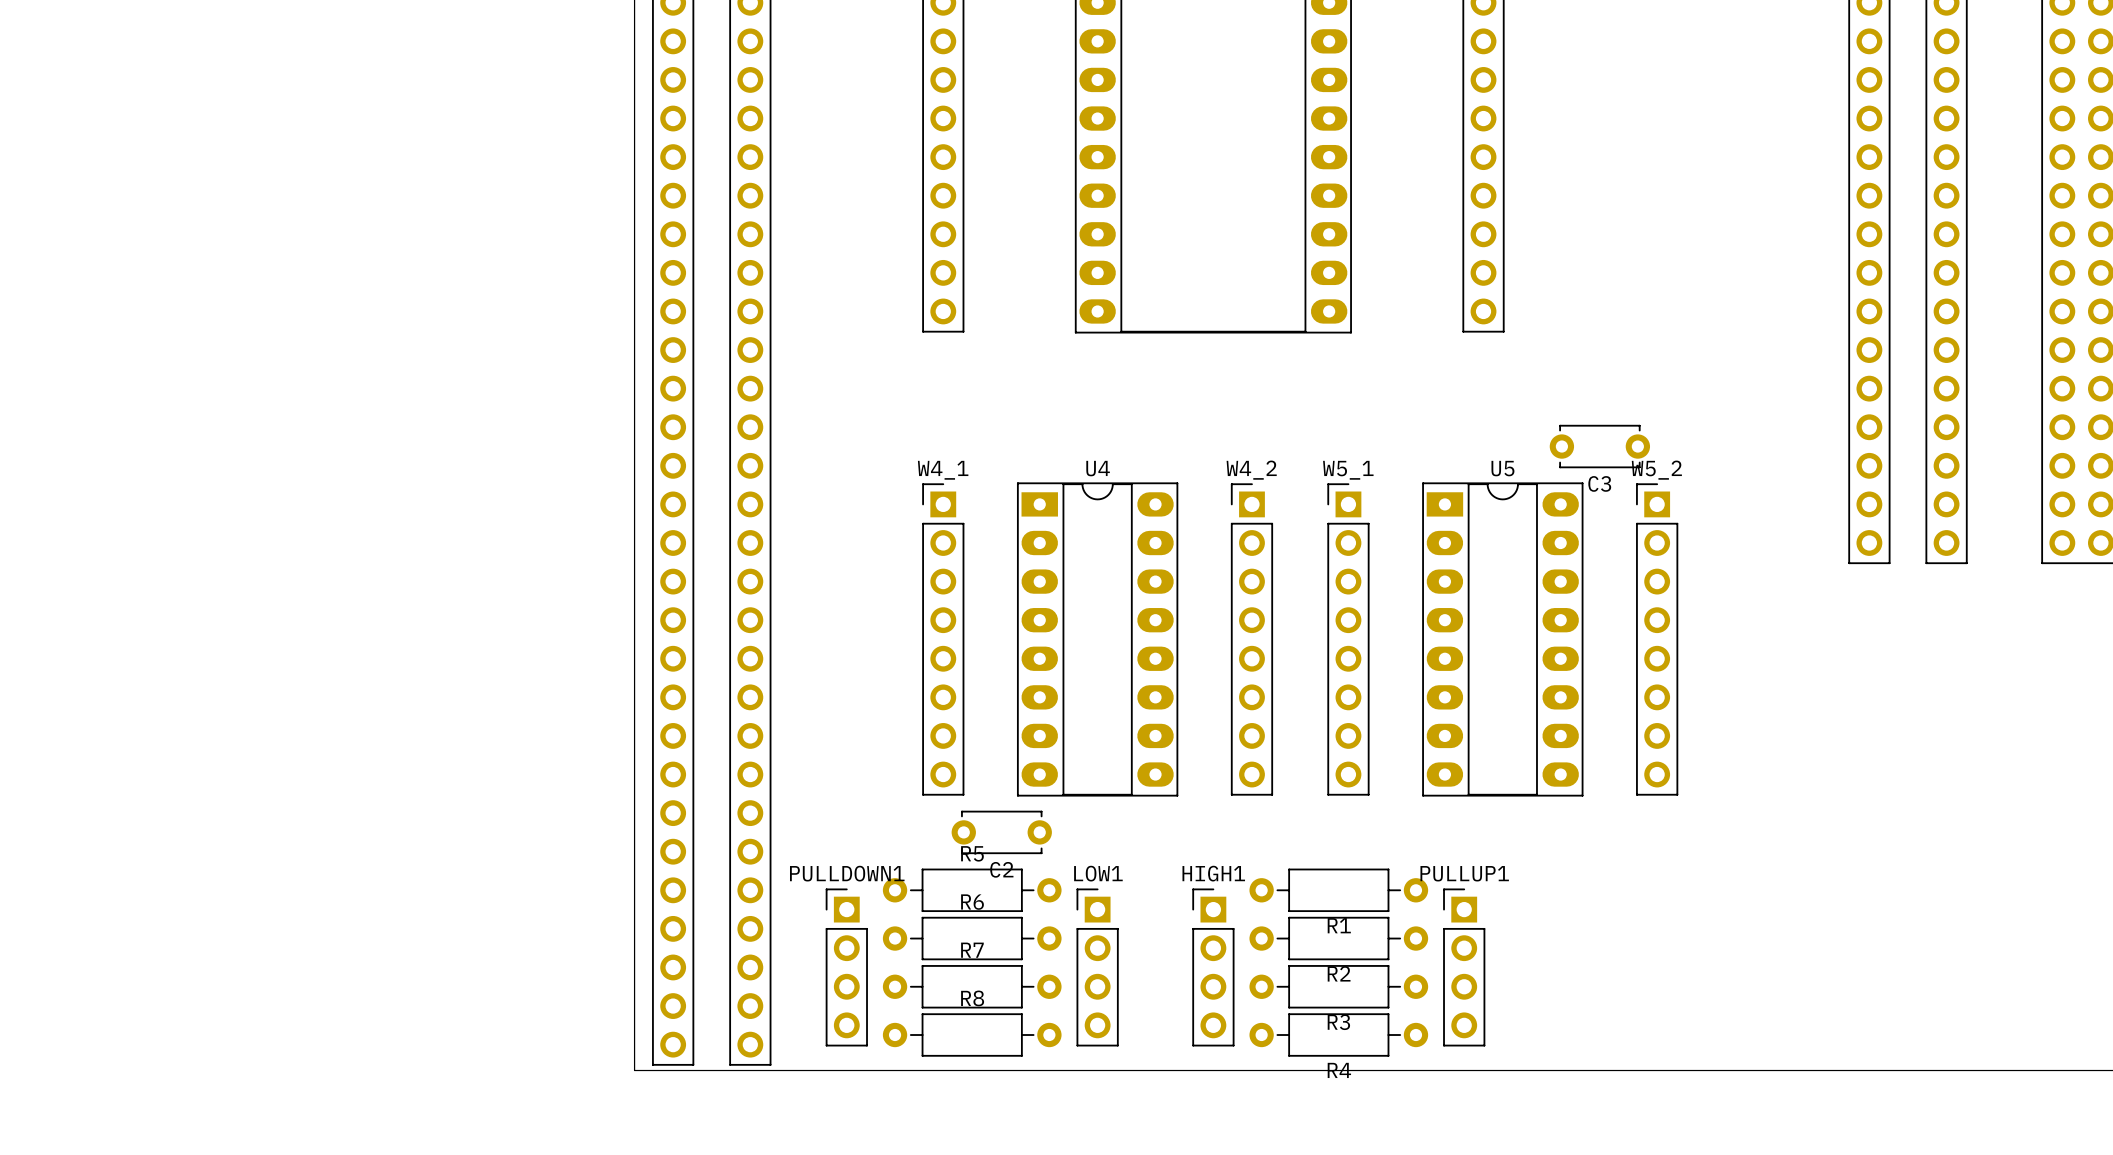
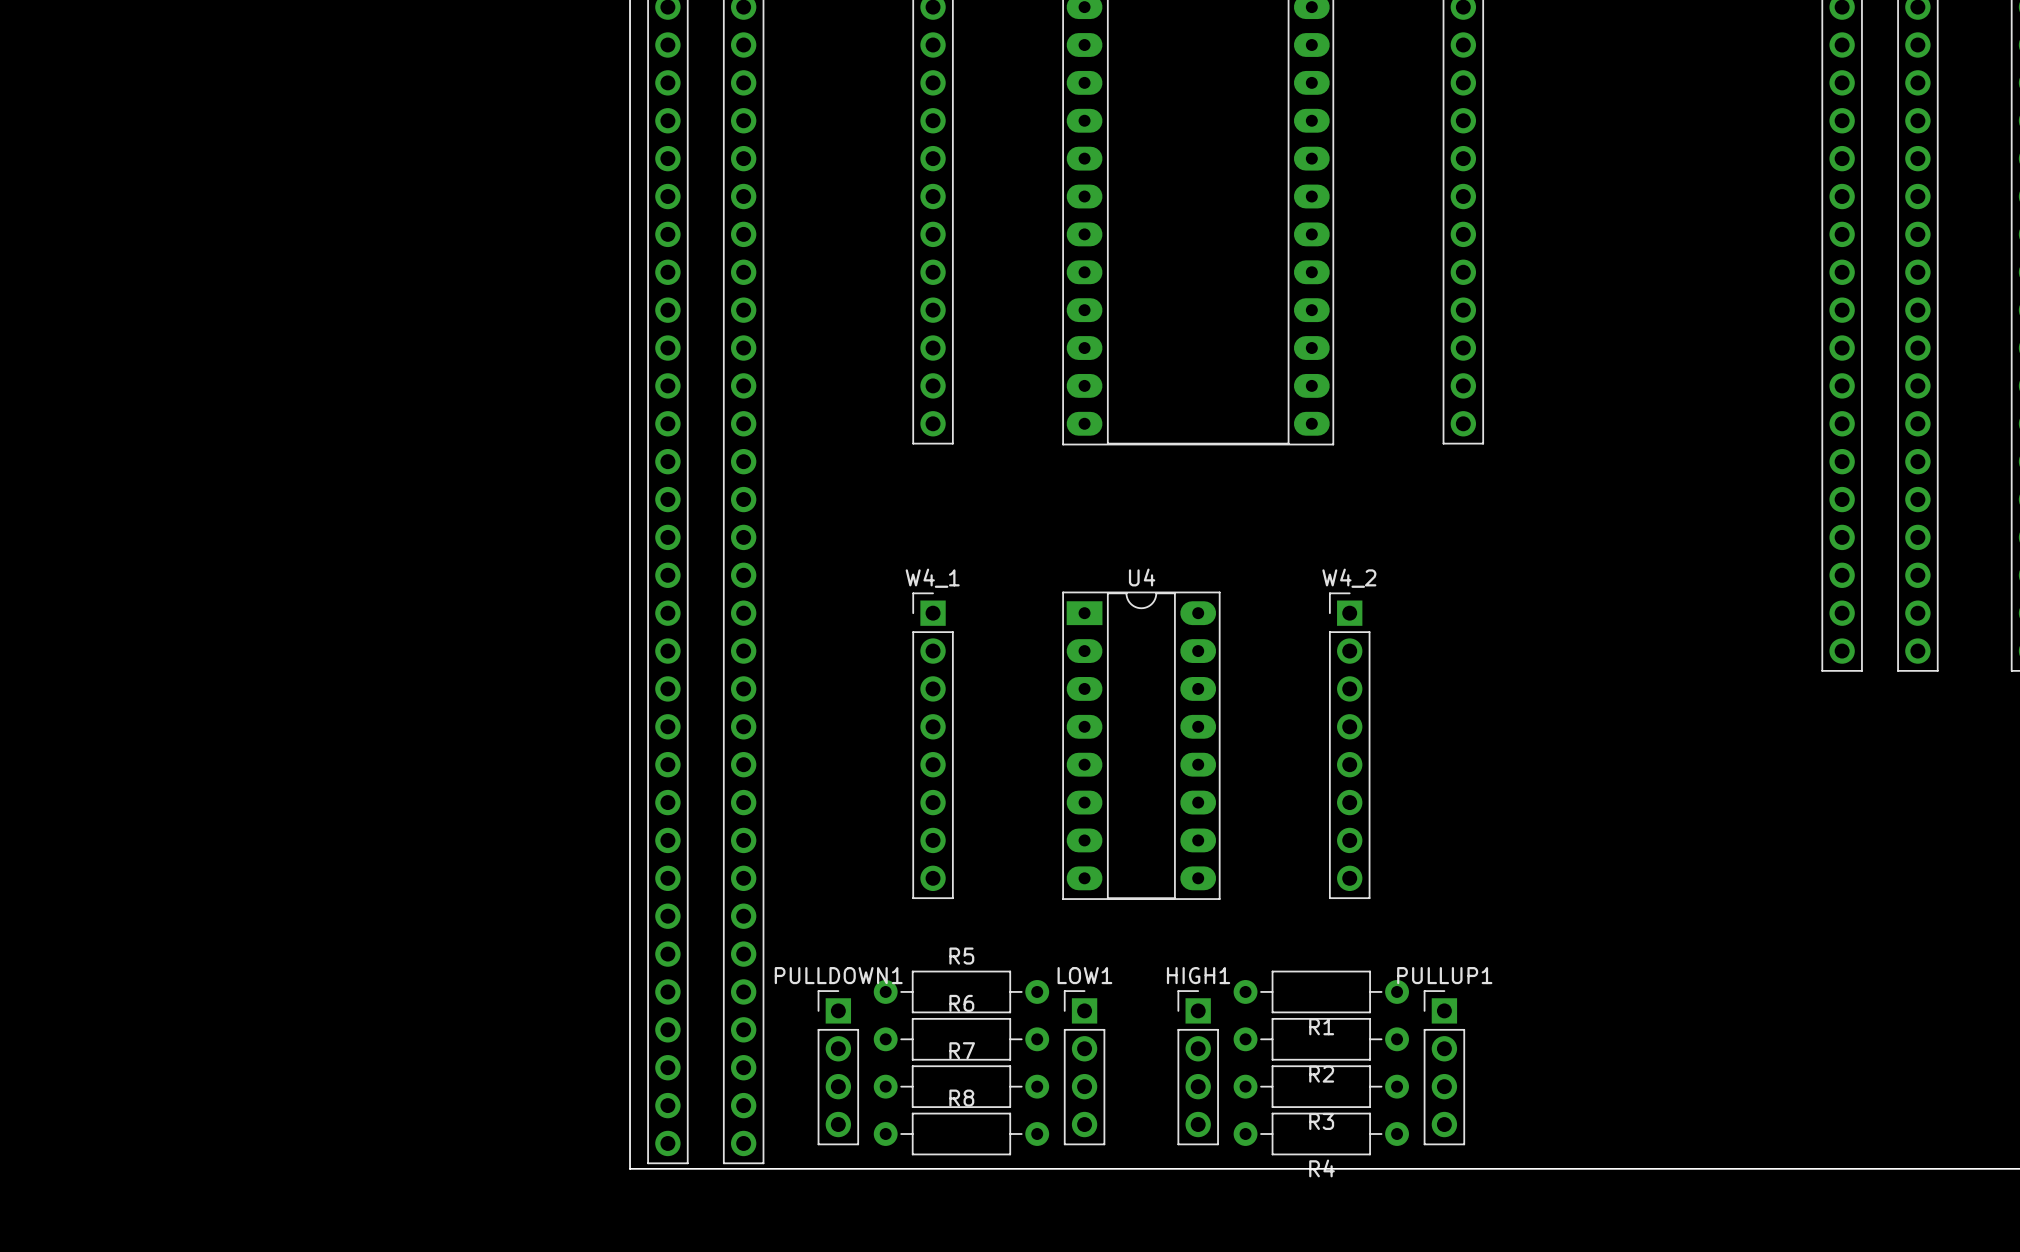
C3: (1599, 446) -> none
U4 position: (1097, 639) -> (1141, 745)
W4_2 position: (1251, 639) -> (1349, 745)
W5_1: (1348, 639) -> none
U5: (1502, 639) -> none
W5_2: (1657, 639) -> none
C2: (1001, 832) -> none

